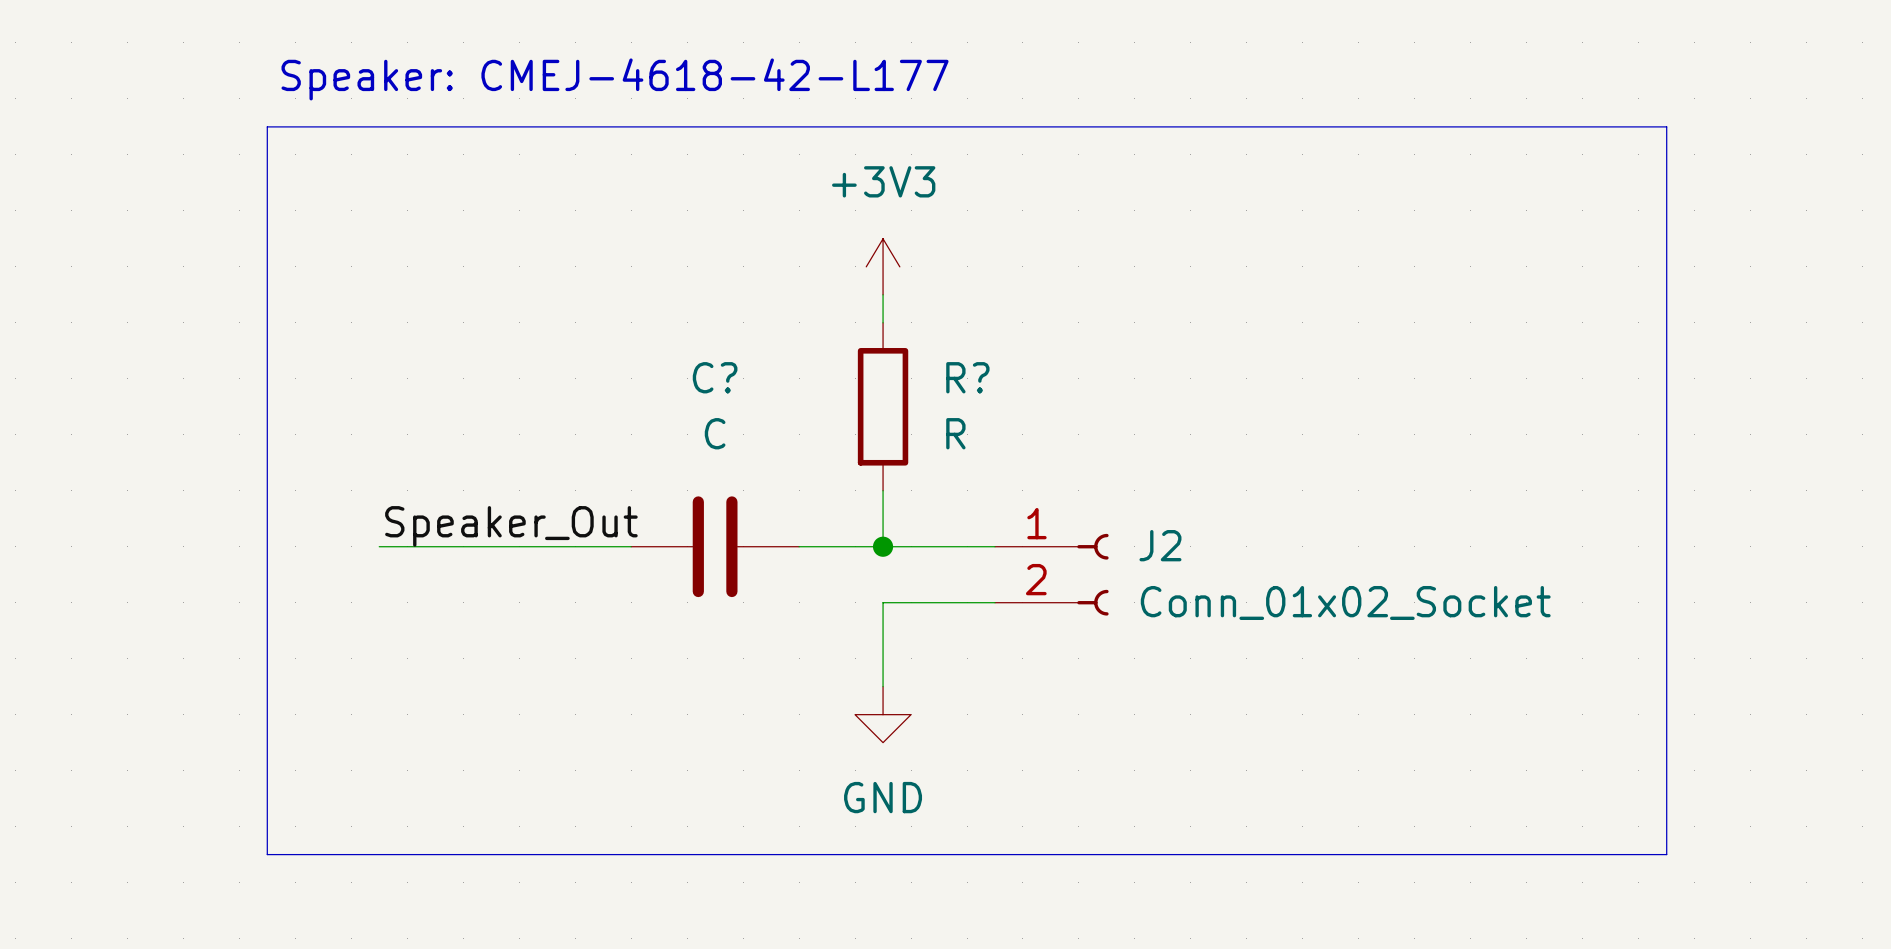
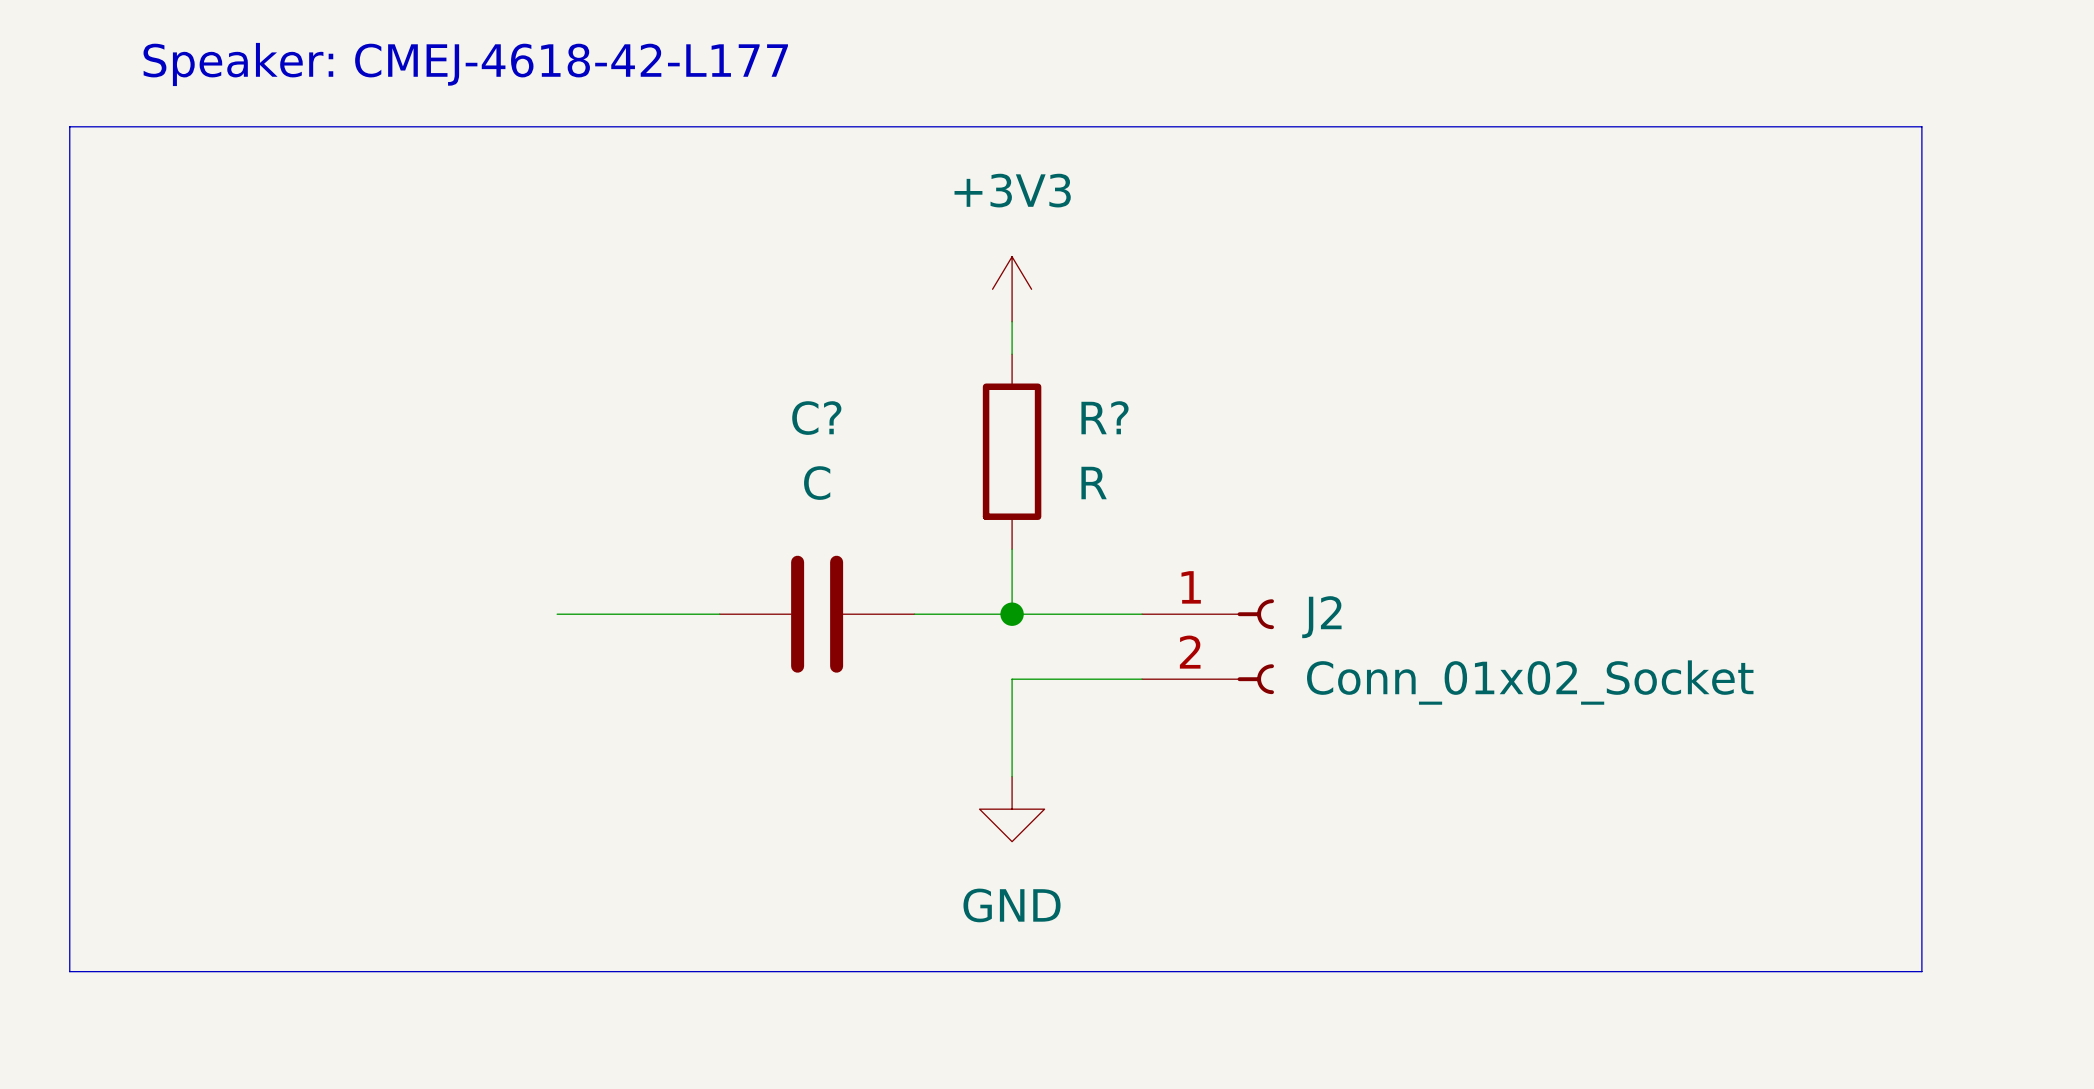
text position: Speaker: CMEJ-4618-42-L177 (615, 79) -> Speaker: CMEJ-4618-42-L177 (465, 64)
line: (267, 126) (267, 854) -> (297, 126) (69, 126) (69, 971) (297, 971)
label: Speaker_Out (511, 526) -> none
wire: (379, 546) (491, 546) -> none

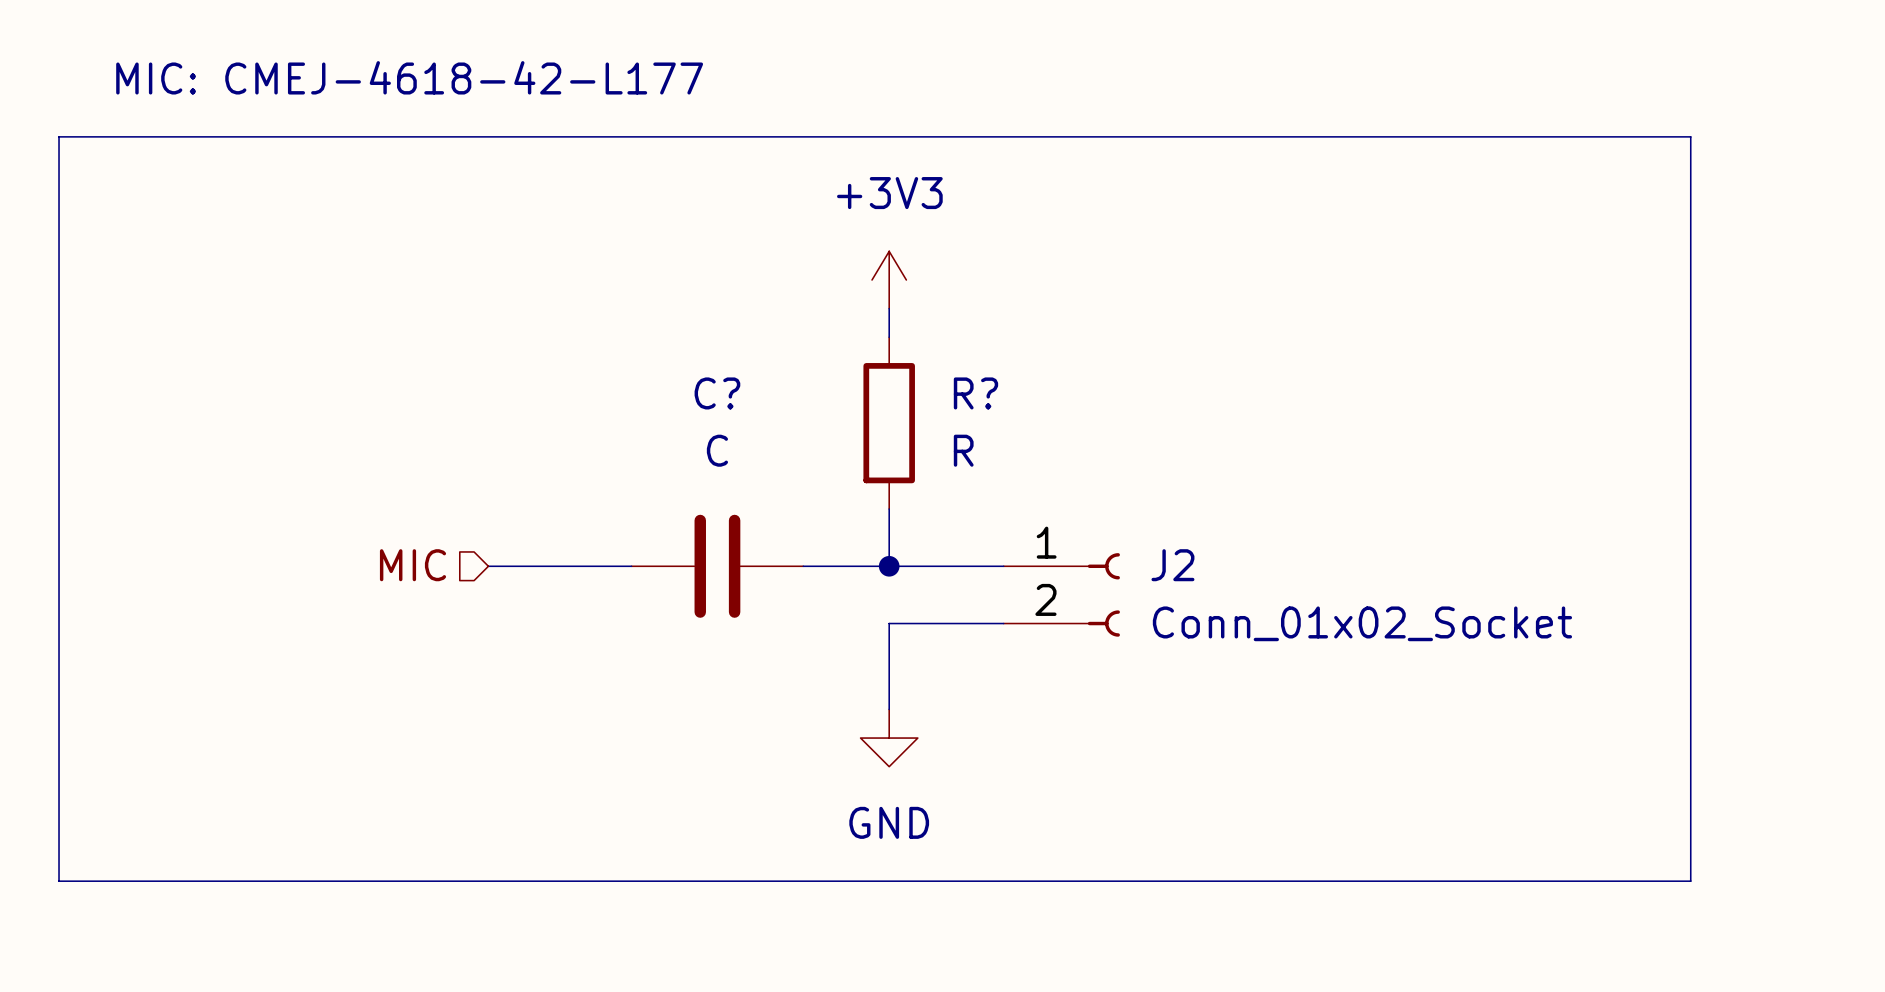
text: Speaker: CMEJ-4618-42-L177 (465, 64) -> MIC: CMEJ-4618-42-L177 (409, 77)
hierarchical label: none -> MIC (412, 565)

